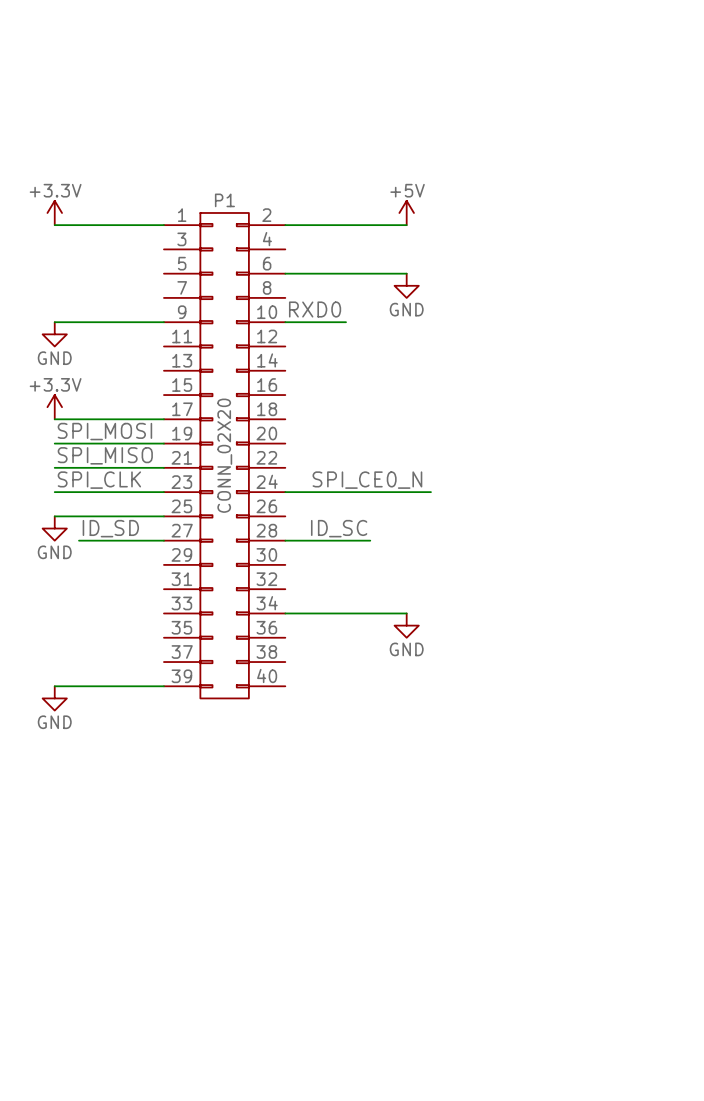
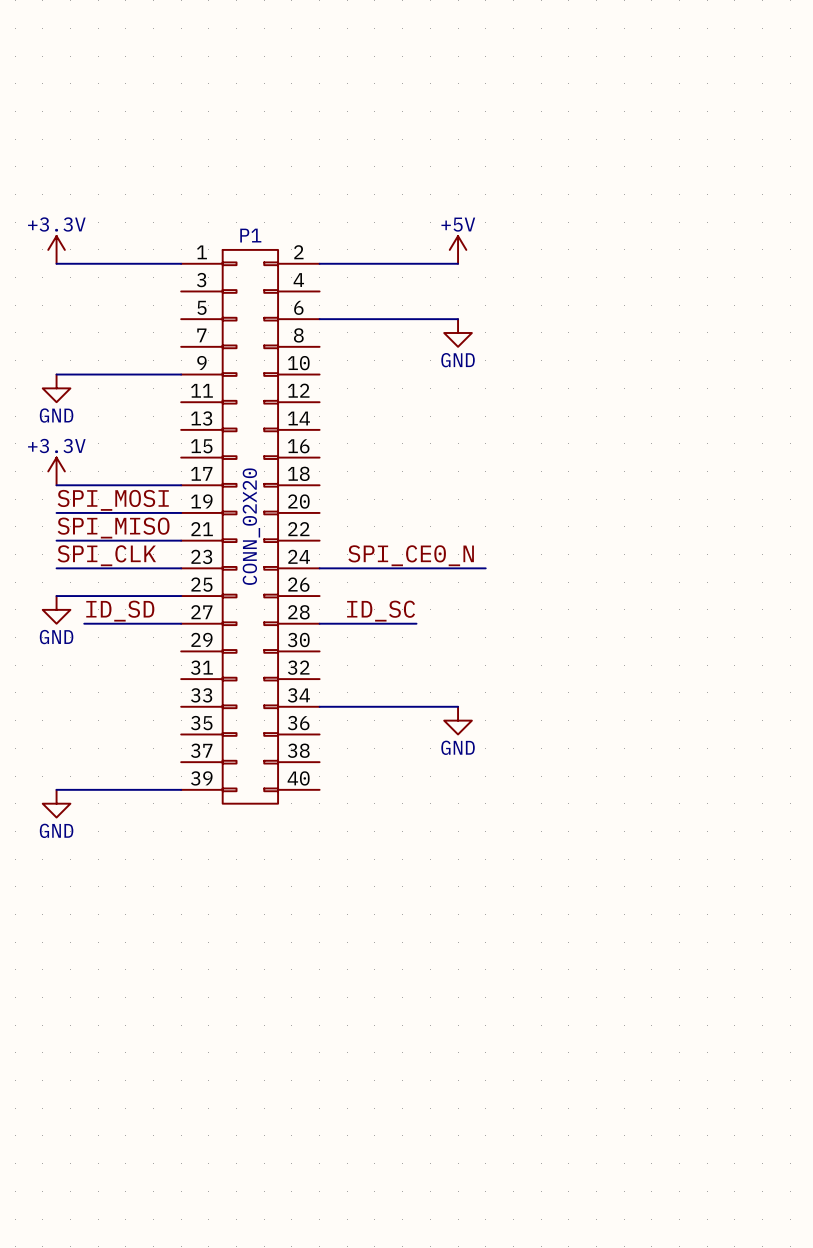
label: RXD0 (315, 309) -> none
wire: (285, 322) (346, 322) -> none

